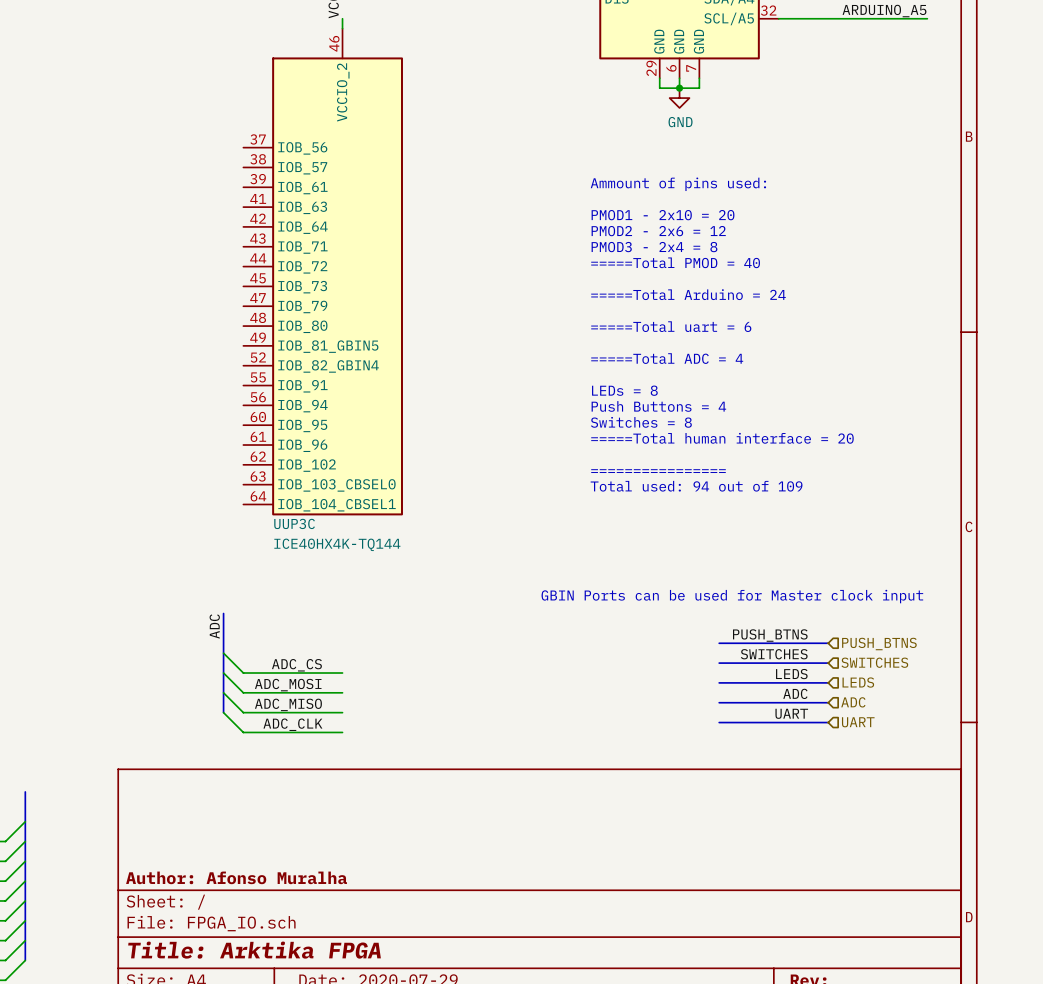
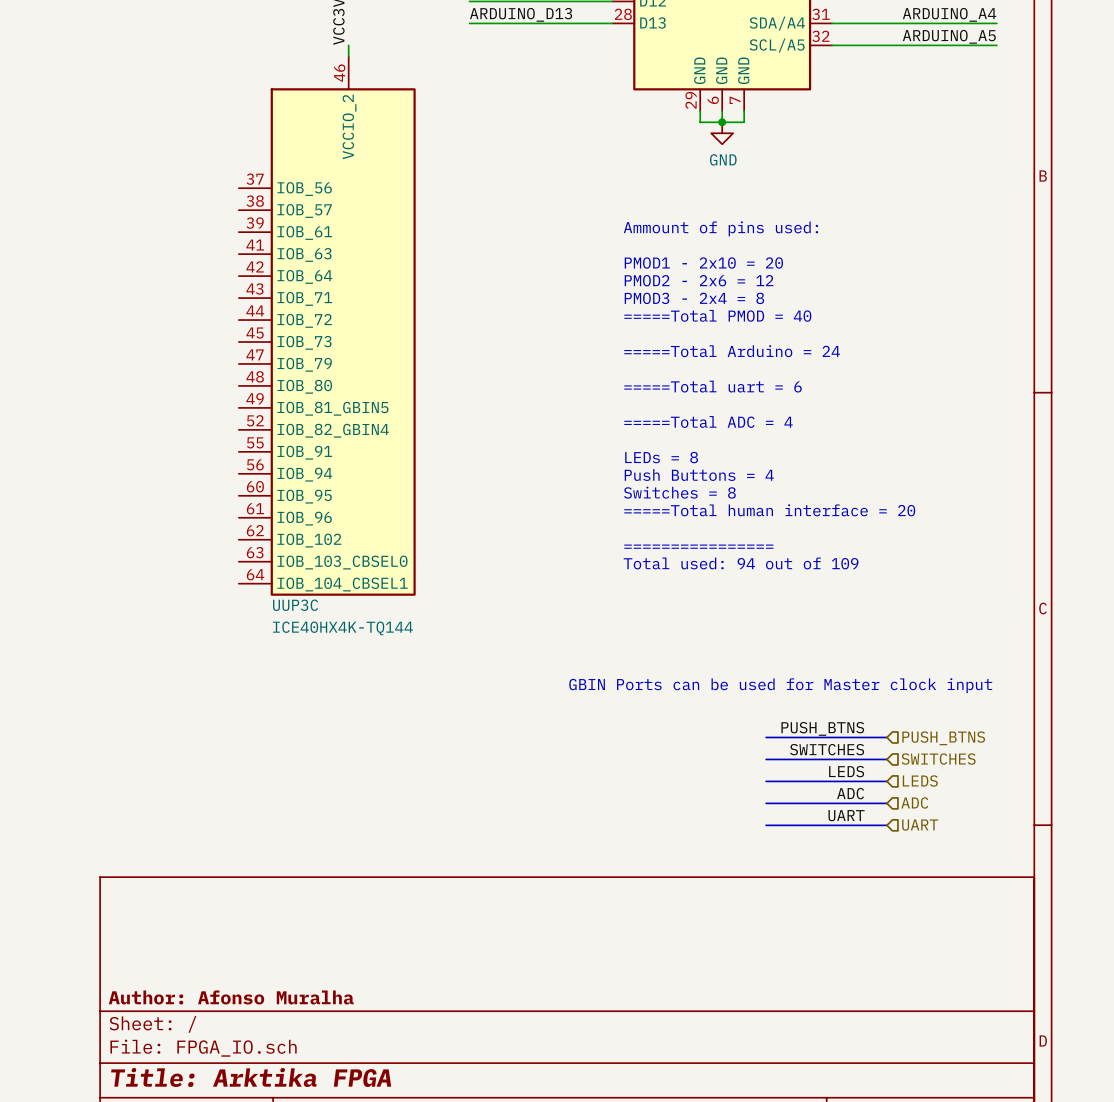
bus: (223, 613) (223, 712) -> none
label: ADC (214, 626) -> none
wire: (223, 653) (243, 672) (342, 672) -> none
label: ADC_CS (296, 665) -> none
wire: (223, 672) (243, 692) (342, 692) -> none
label: ADC_MOSI (288, 685) -> none
wire: (223, 692) (243, 712) (342, 712) -> none
label: ADC_MISO (288, 704) -> none
wire: (223, 712) (243, 732) (342, 732) -> none
label: ADC_CLK (292, 724) -> none

